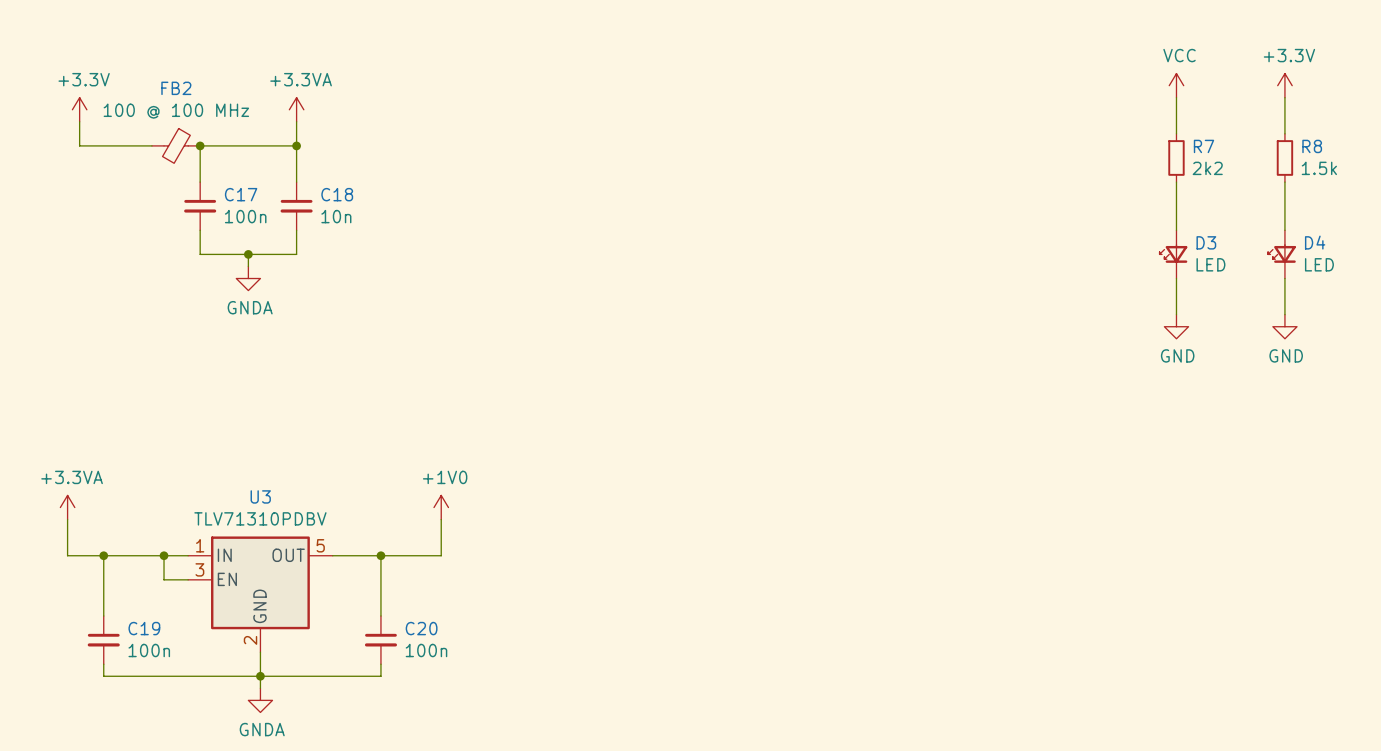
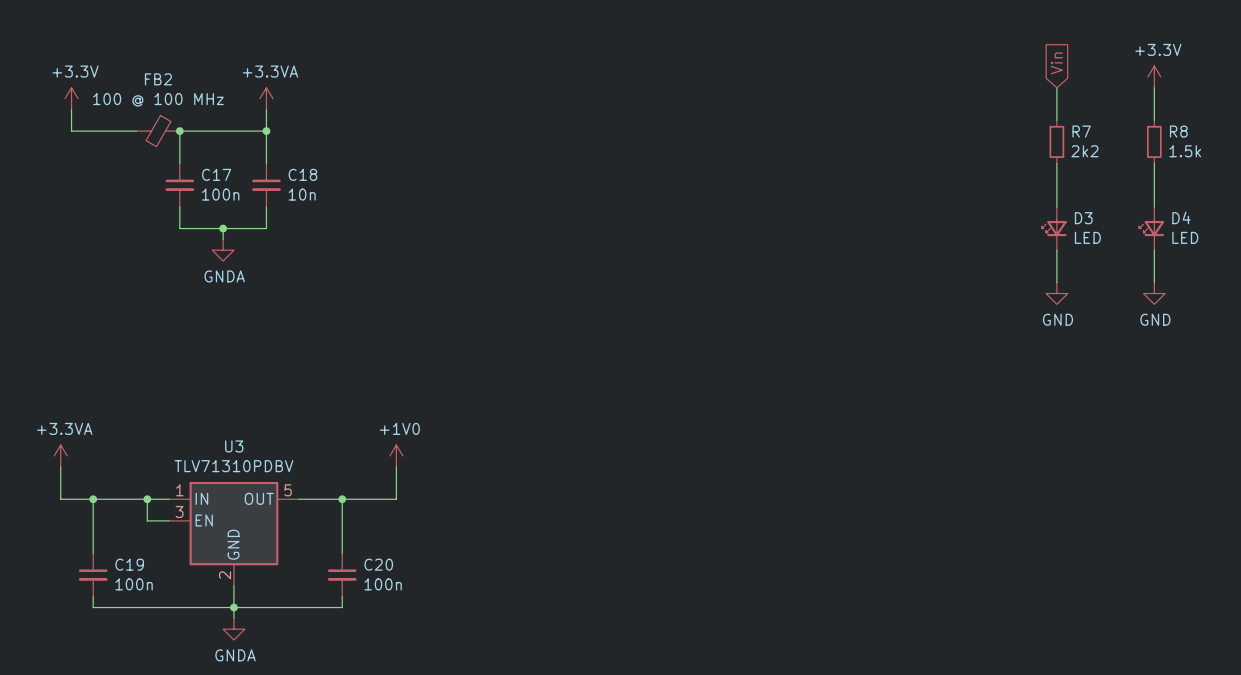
global label: none -> Vin (1056, 63)
power symbol: VCC (1176, 85) -> none

